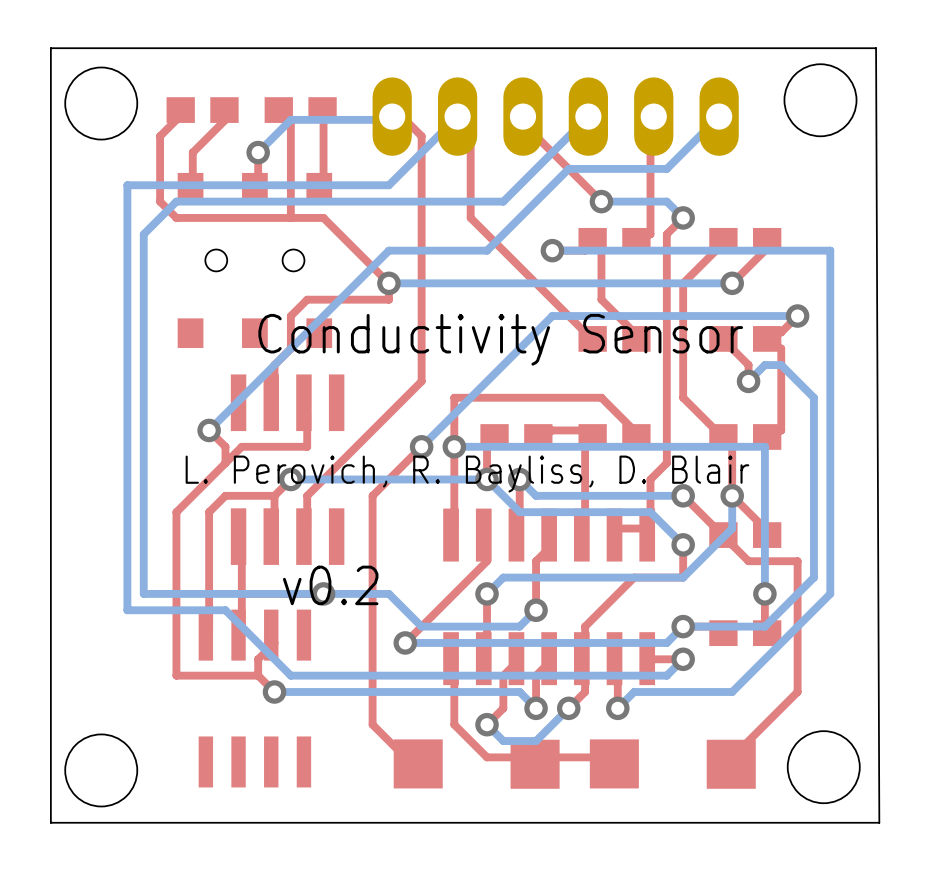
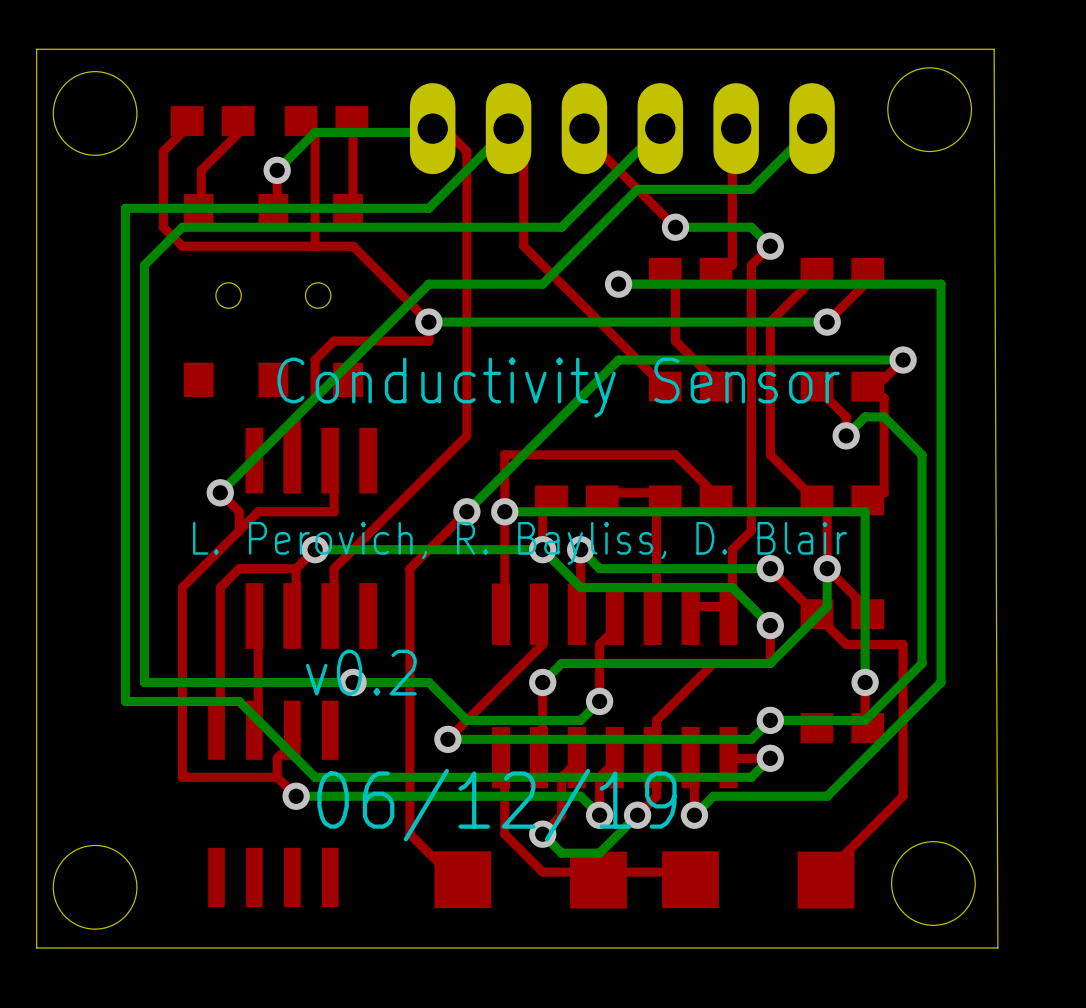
text: none -> 06/12/19 (496, 805)

